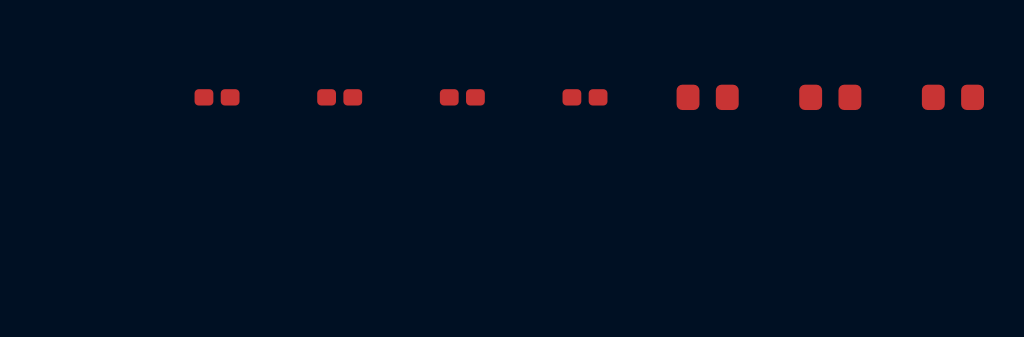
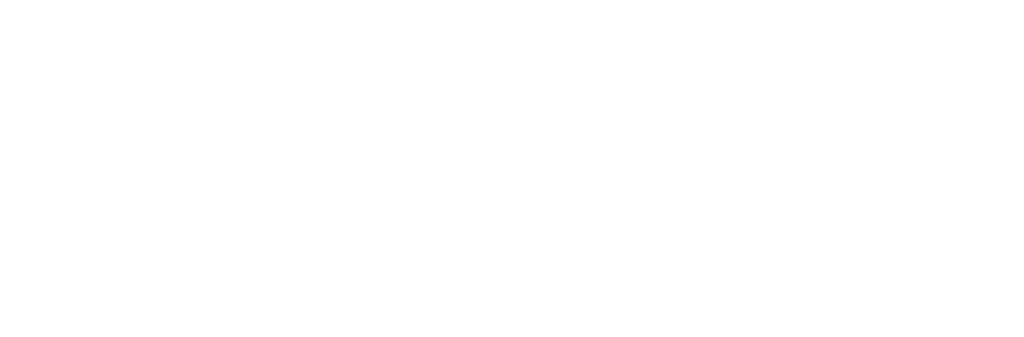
part: (217, 97) -> none
part: (339, 97) -> none
part: (462, 97) -> none
part: (584, 97) -> none
part: (707, 97) -> none
part: (830, 97) -> none
part: (952, 97) -> none

